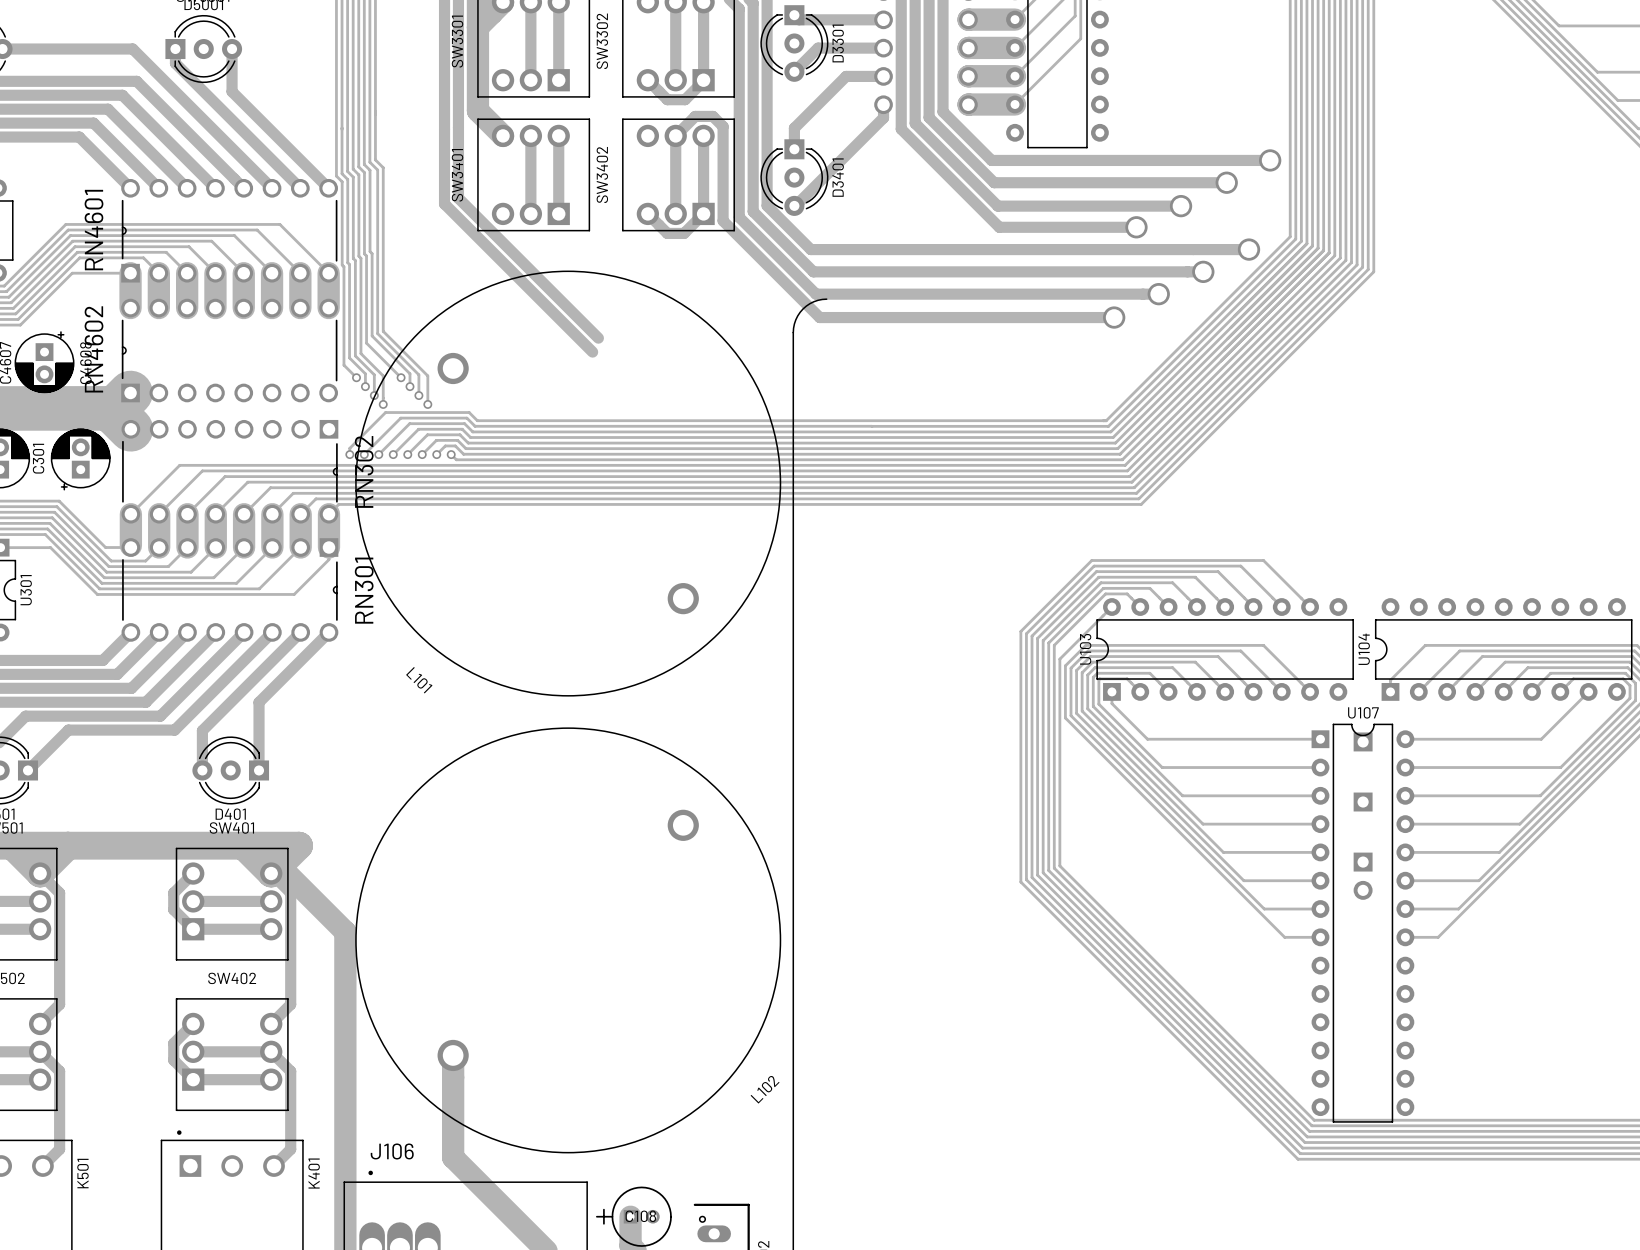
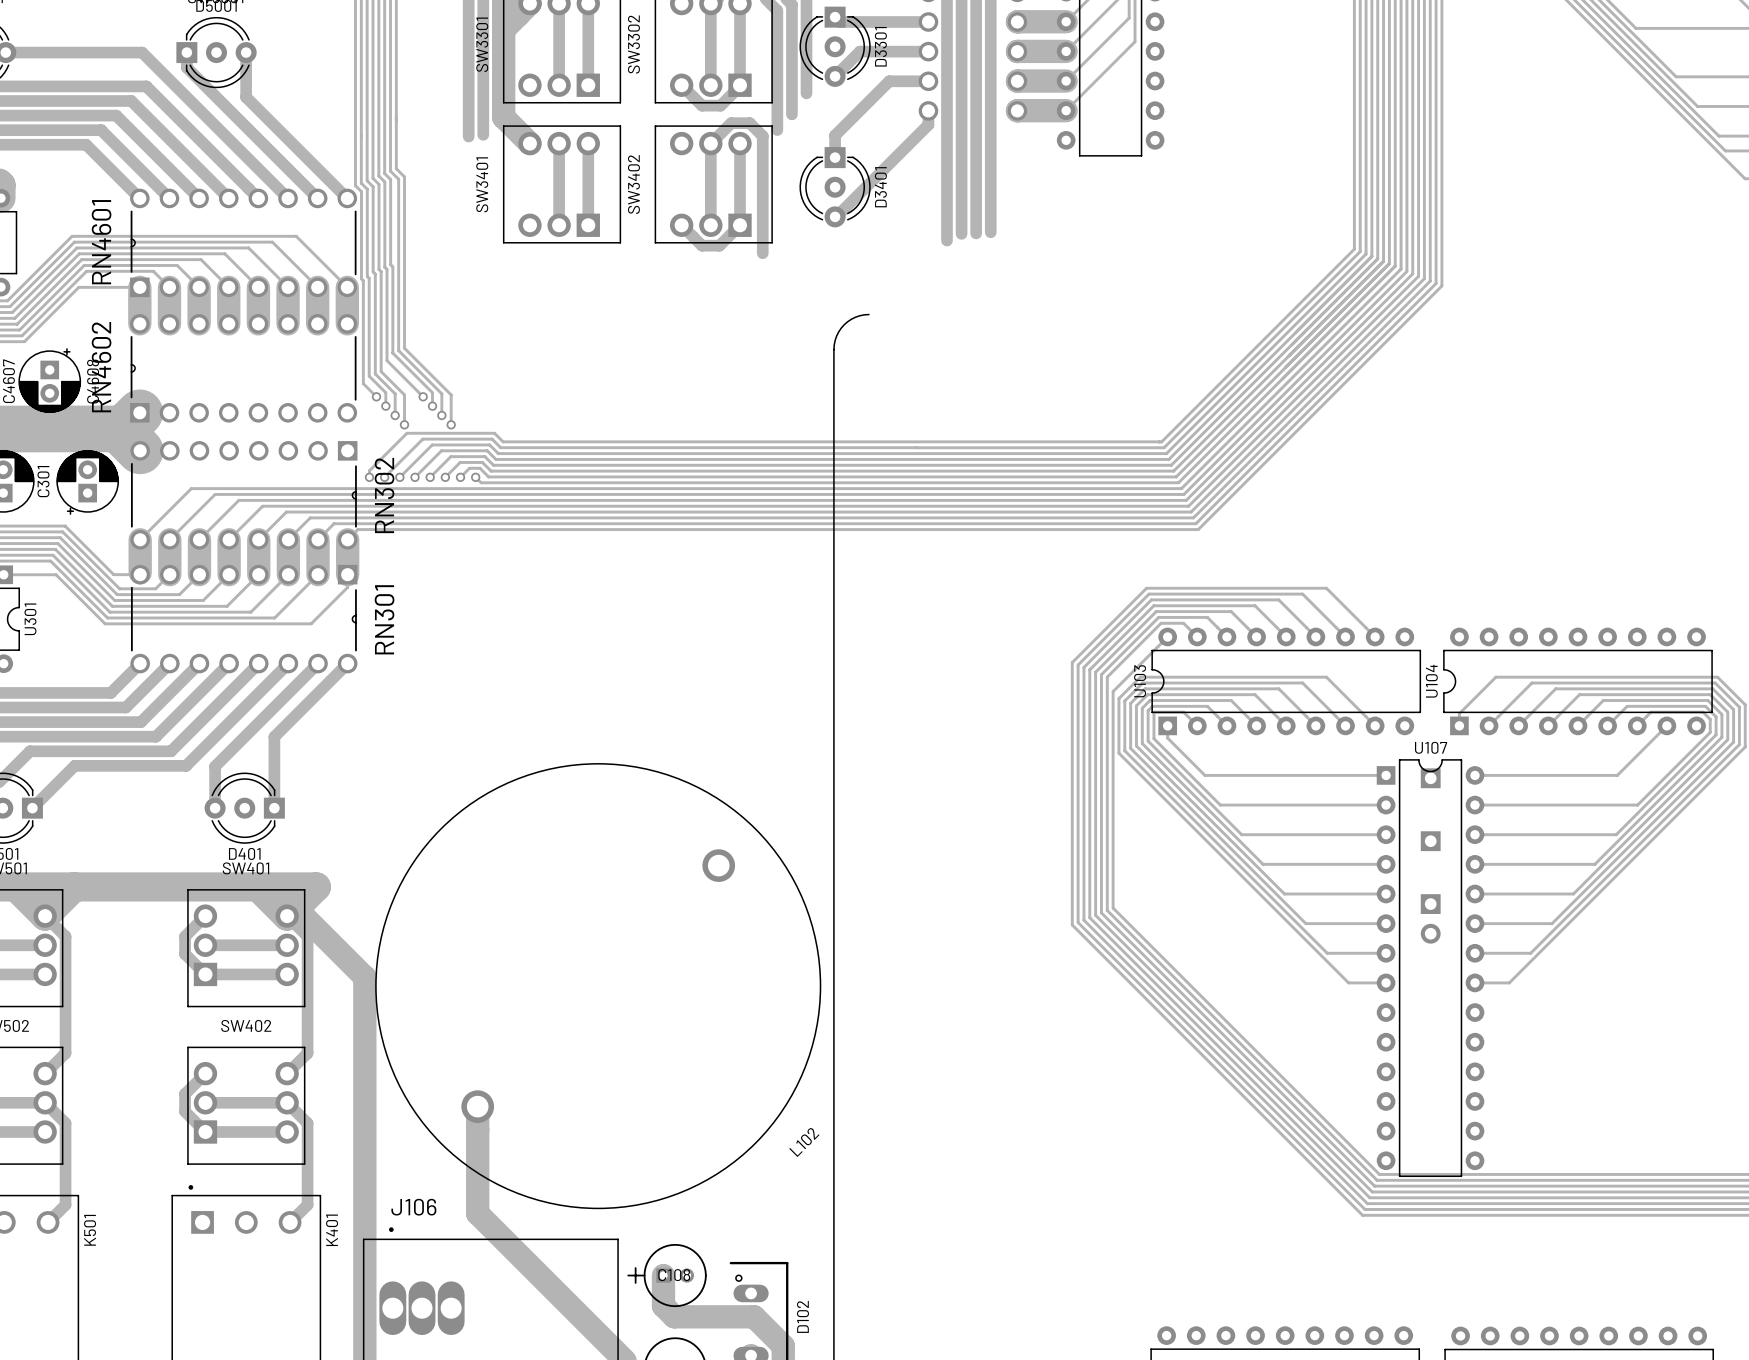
track: (767, 88) (767, 205) (810, 249) (1249, 249) -> none
track: (753, 108) (753, 211) (813, 271) (1203, 271) -> none
track: (943, 111) (991, 160) (1270, 160) -> (990, 118) (990, 232)
track: (929, 117) (994, 182) (1226, 182) -> (976, 124) (976, 233)
track: (739, 123) (739, 217) (816, 294) (1158, 294) -> none
track: (915, 123) (997, 206) (1181, 206) -> (961, 130) (961, 233)
track: (723, 126) (723, 220) (819, 317) (1114, 317) -> (760, 133) (762, 136) (762, 253)
track: (458, 127) (458, 198) (598, 338) -> none
track: (444, 129) (444, 203) (592, 352) -> none
track: (901, 129) (999, 227) (1136, 227) -> (946, 136) (946, 240)
via: (1270, 160) -> none
via: (1226, 182) -> none
via: (1181, 206) -> none
via: (1136, 227) -> none
via: (1249, 249) -> none
via: (1203, 271) -> none
via: (1158, 294) -> none
via: (1114, 317) -> none
L101: (568, 483) -> none

